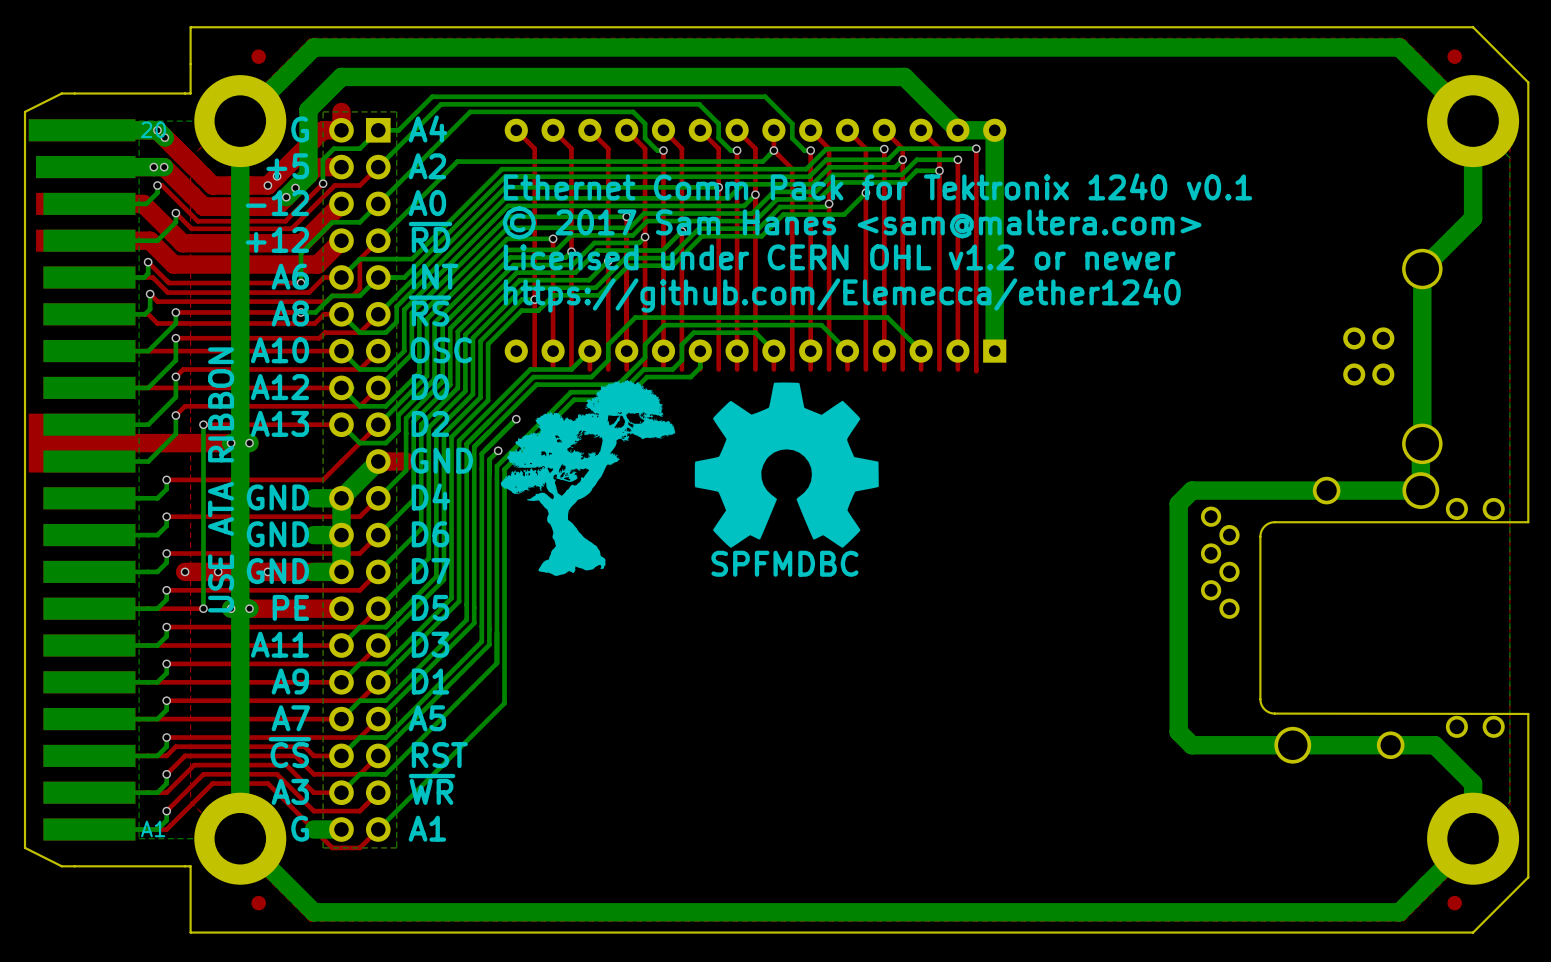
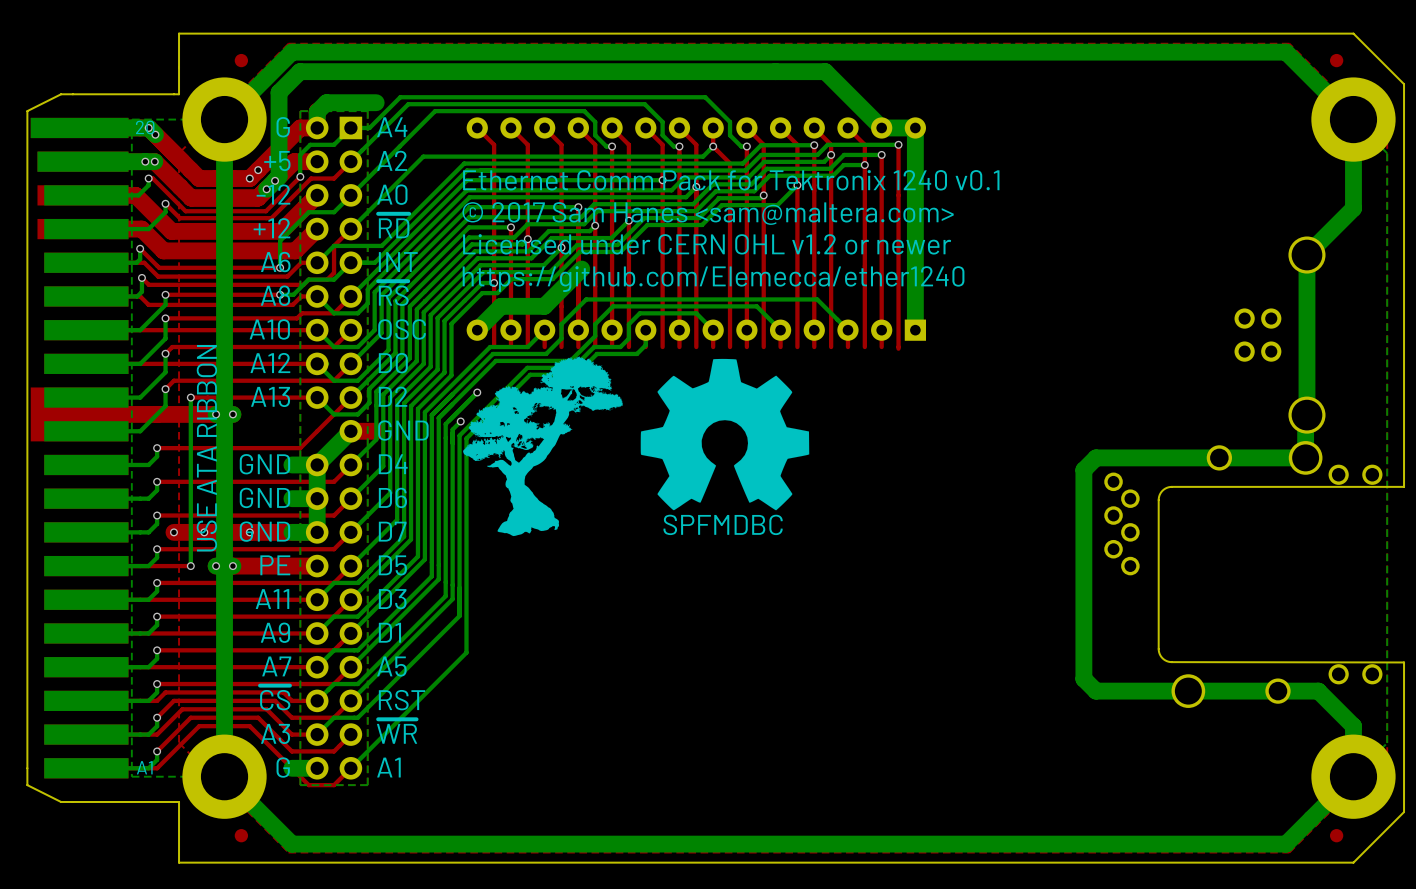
bottom track: (904, 76) (341, 76) (308, 109) (308, 175) (299, 183) -> (832, 79) (825, 71) (300, 71) (279, 92) (279, 176)
bottom track: none -> (376, 102) (326, 102) (317, 112) (317, 127)
bottom track: none -> (581, 269) (544, 306) (501, 306) (477, 330)

